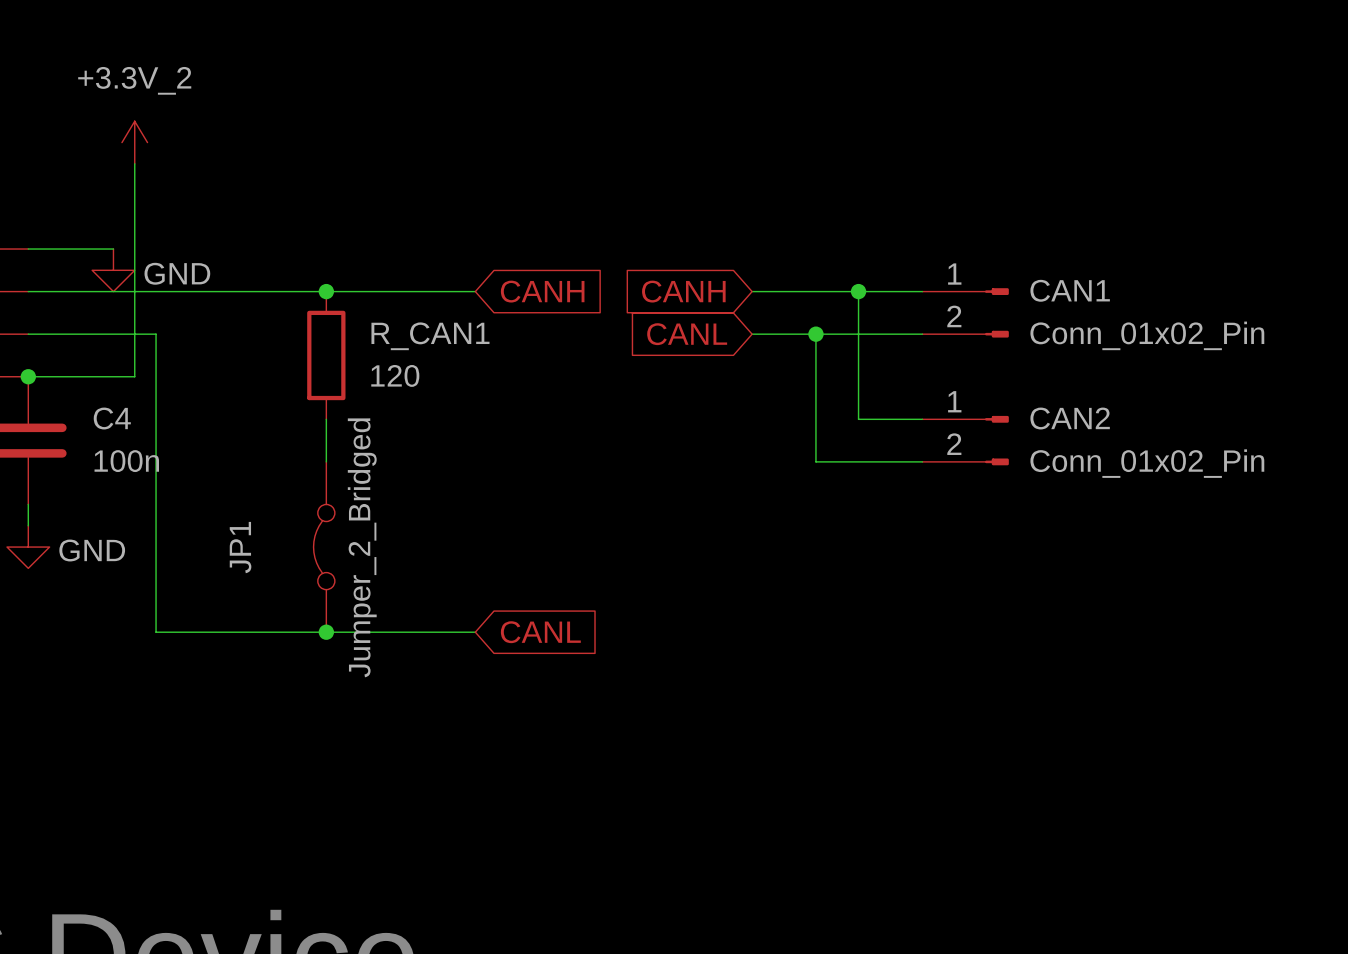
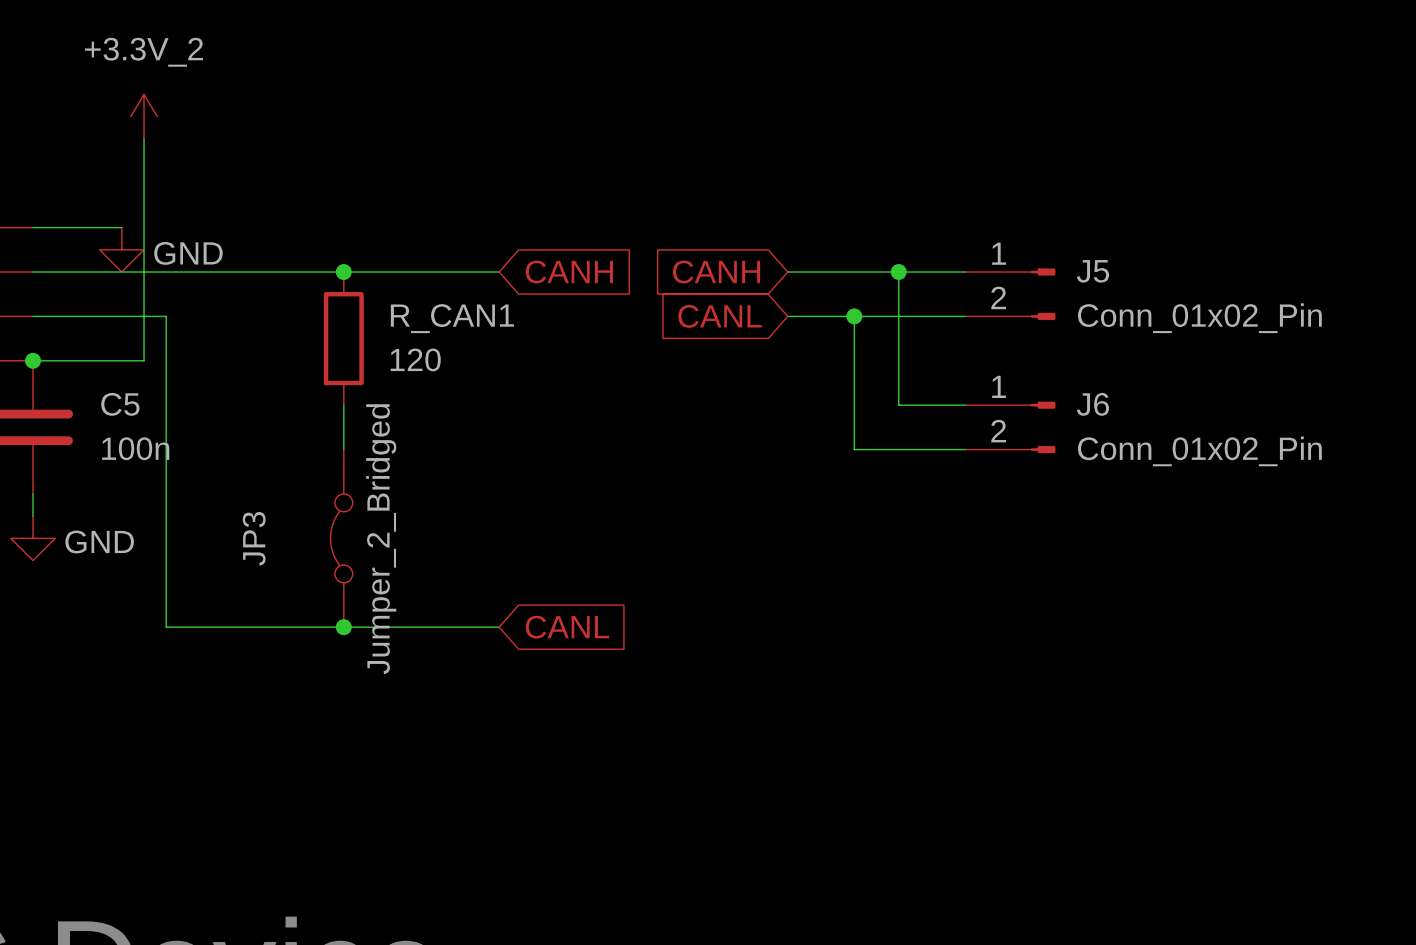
CAN1 name: CAN1 (1070, 290) -> J5 (1092, 271)
C4 name: C4 (112, 418) -> C5 (120, 404)
CAN2 name: CAN2 (1070, 418) -> J6 (1092, 404)
JP1 name: JP1 (240, 547) -> JP3 (254, 538)

